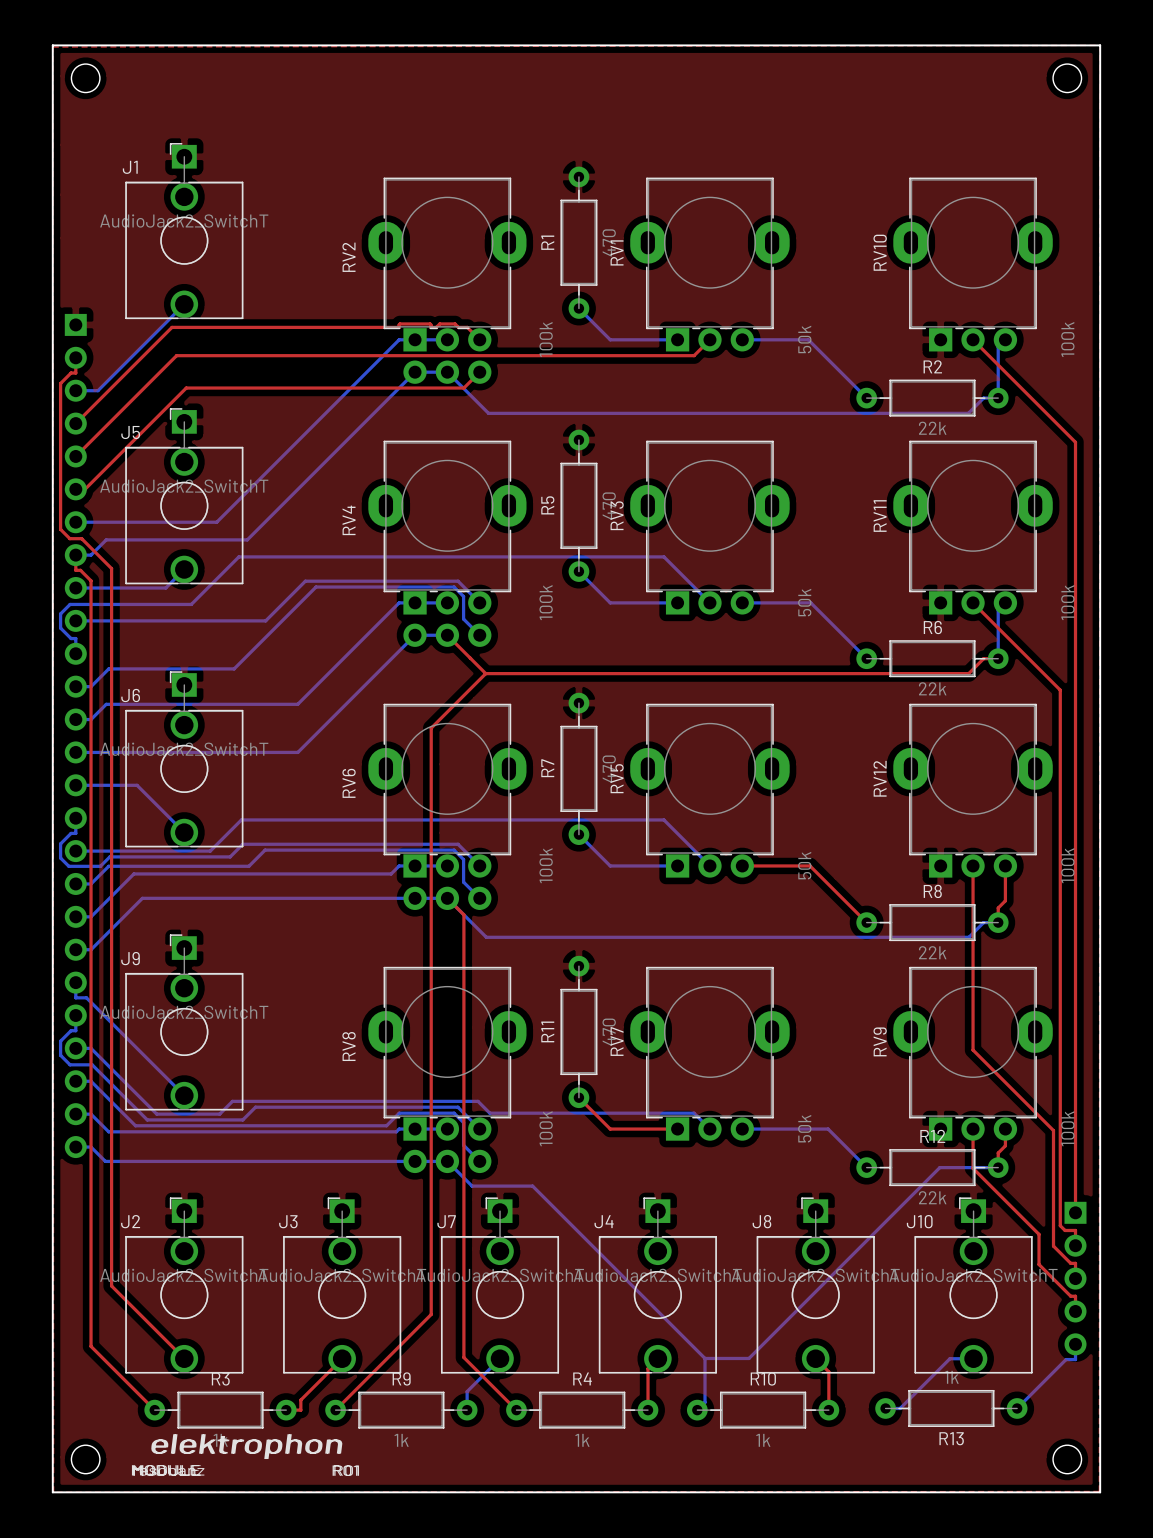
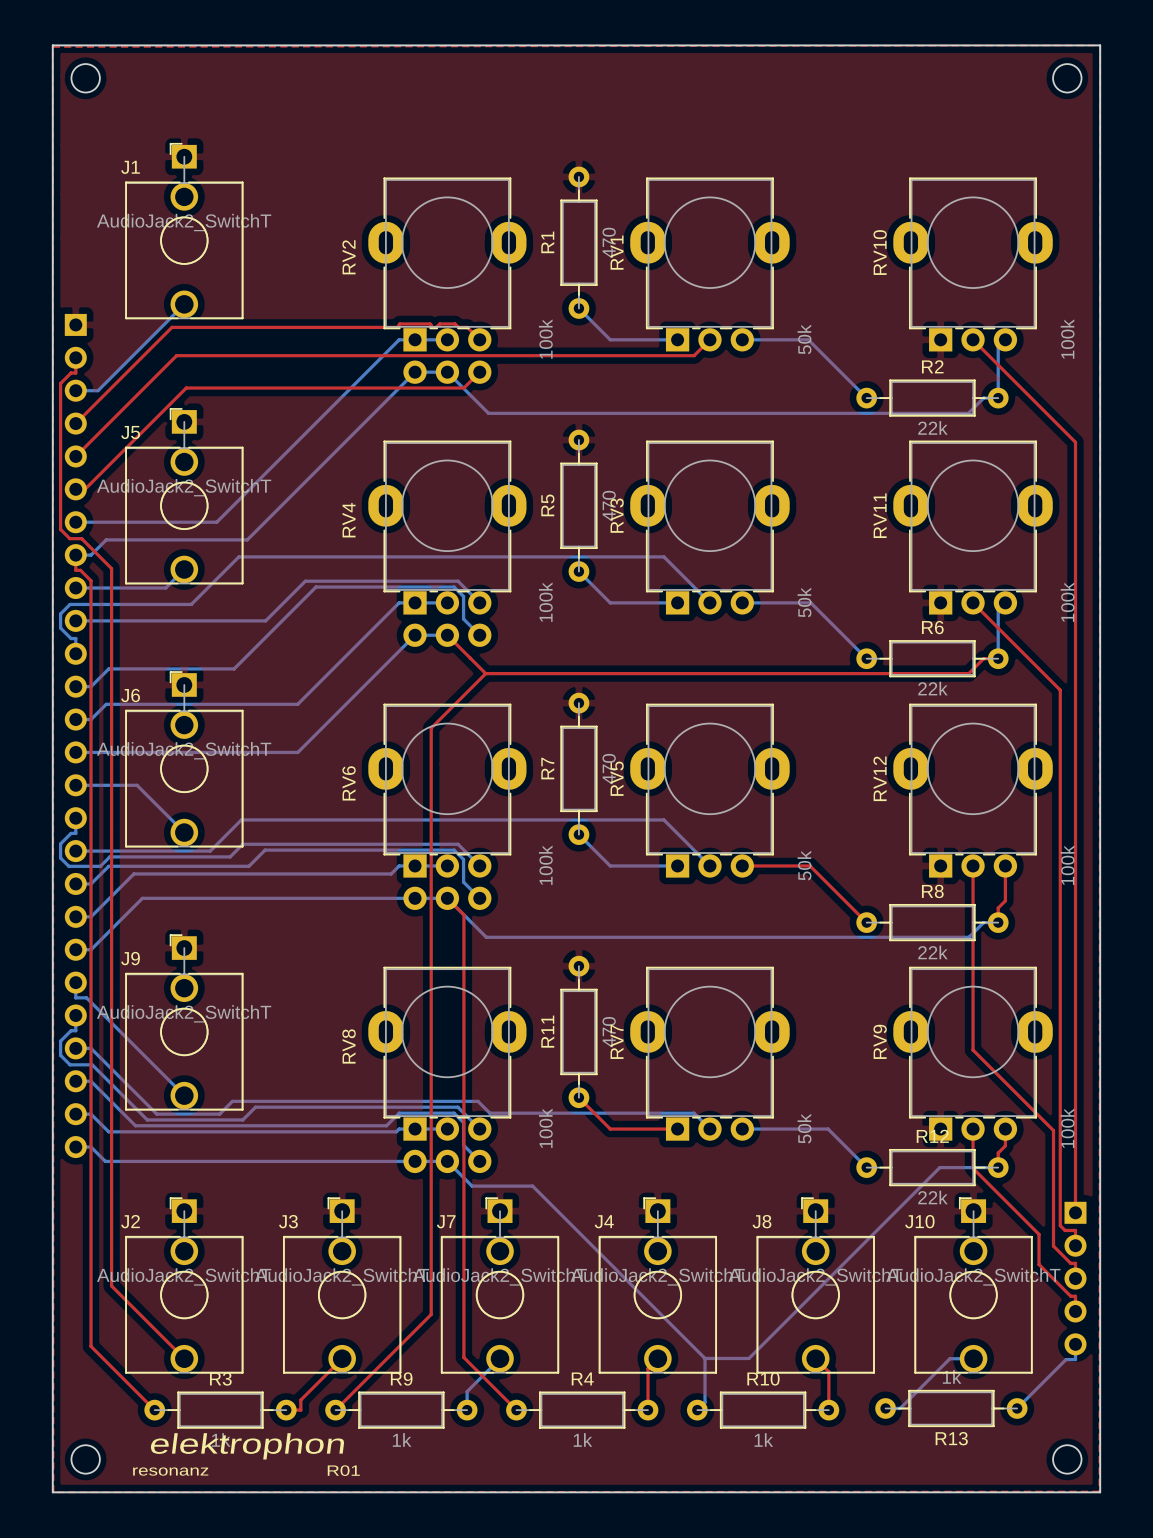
drawing: [131, 1434, 358, 1476] -> none
drawing shape: [133, 1434, 360, 1476] -> [133, 1433, 360, 1476]

